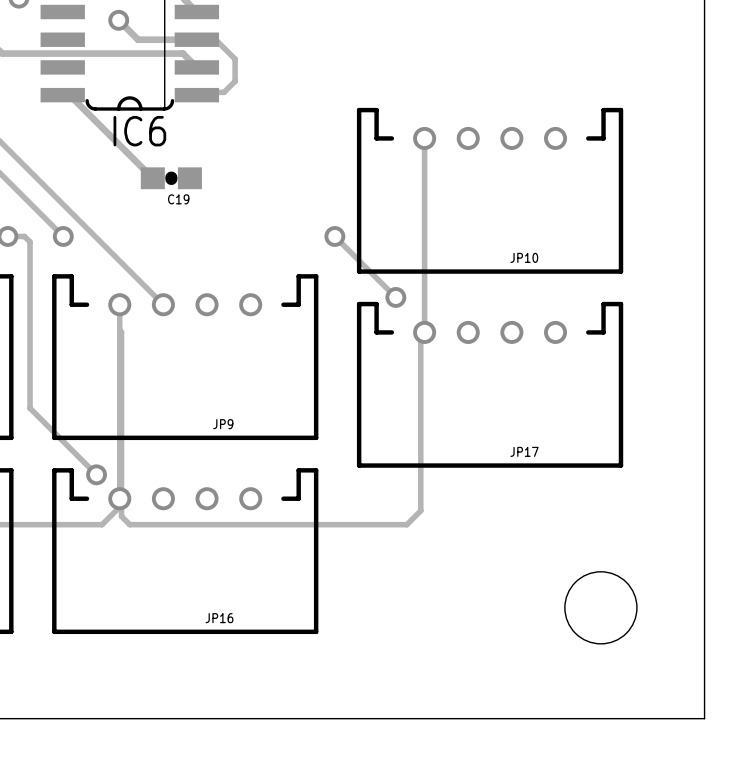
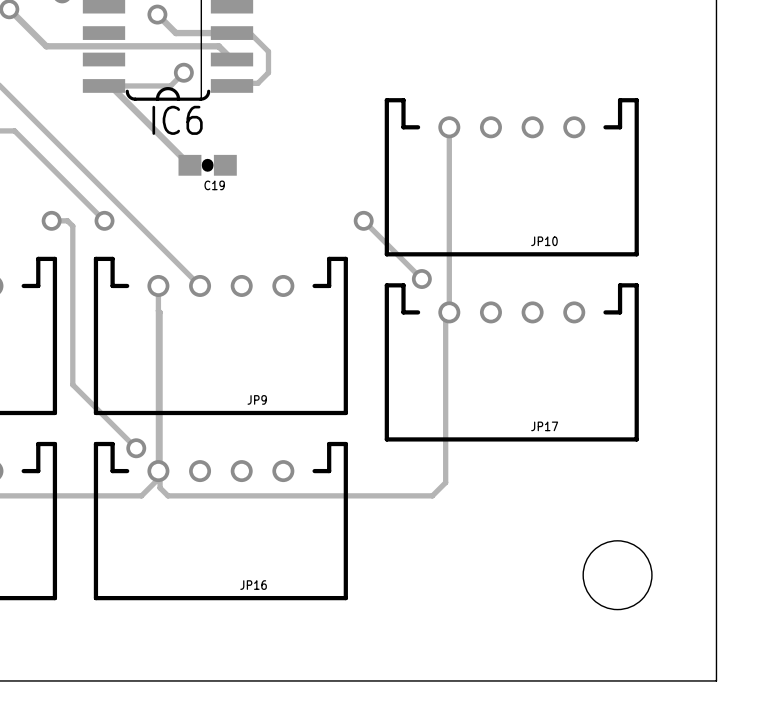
track: none -> (183, 72) (170, 85) (110, 85)
via: none -> (183, 72)

